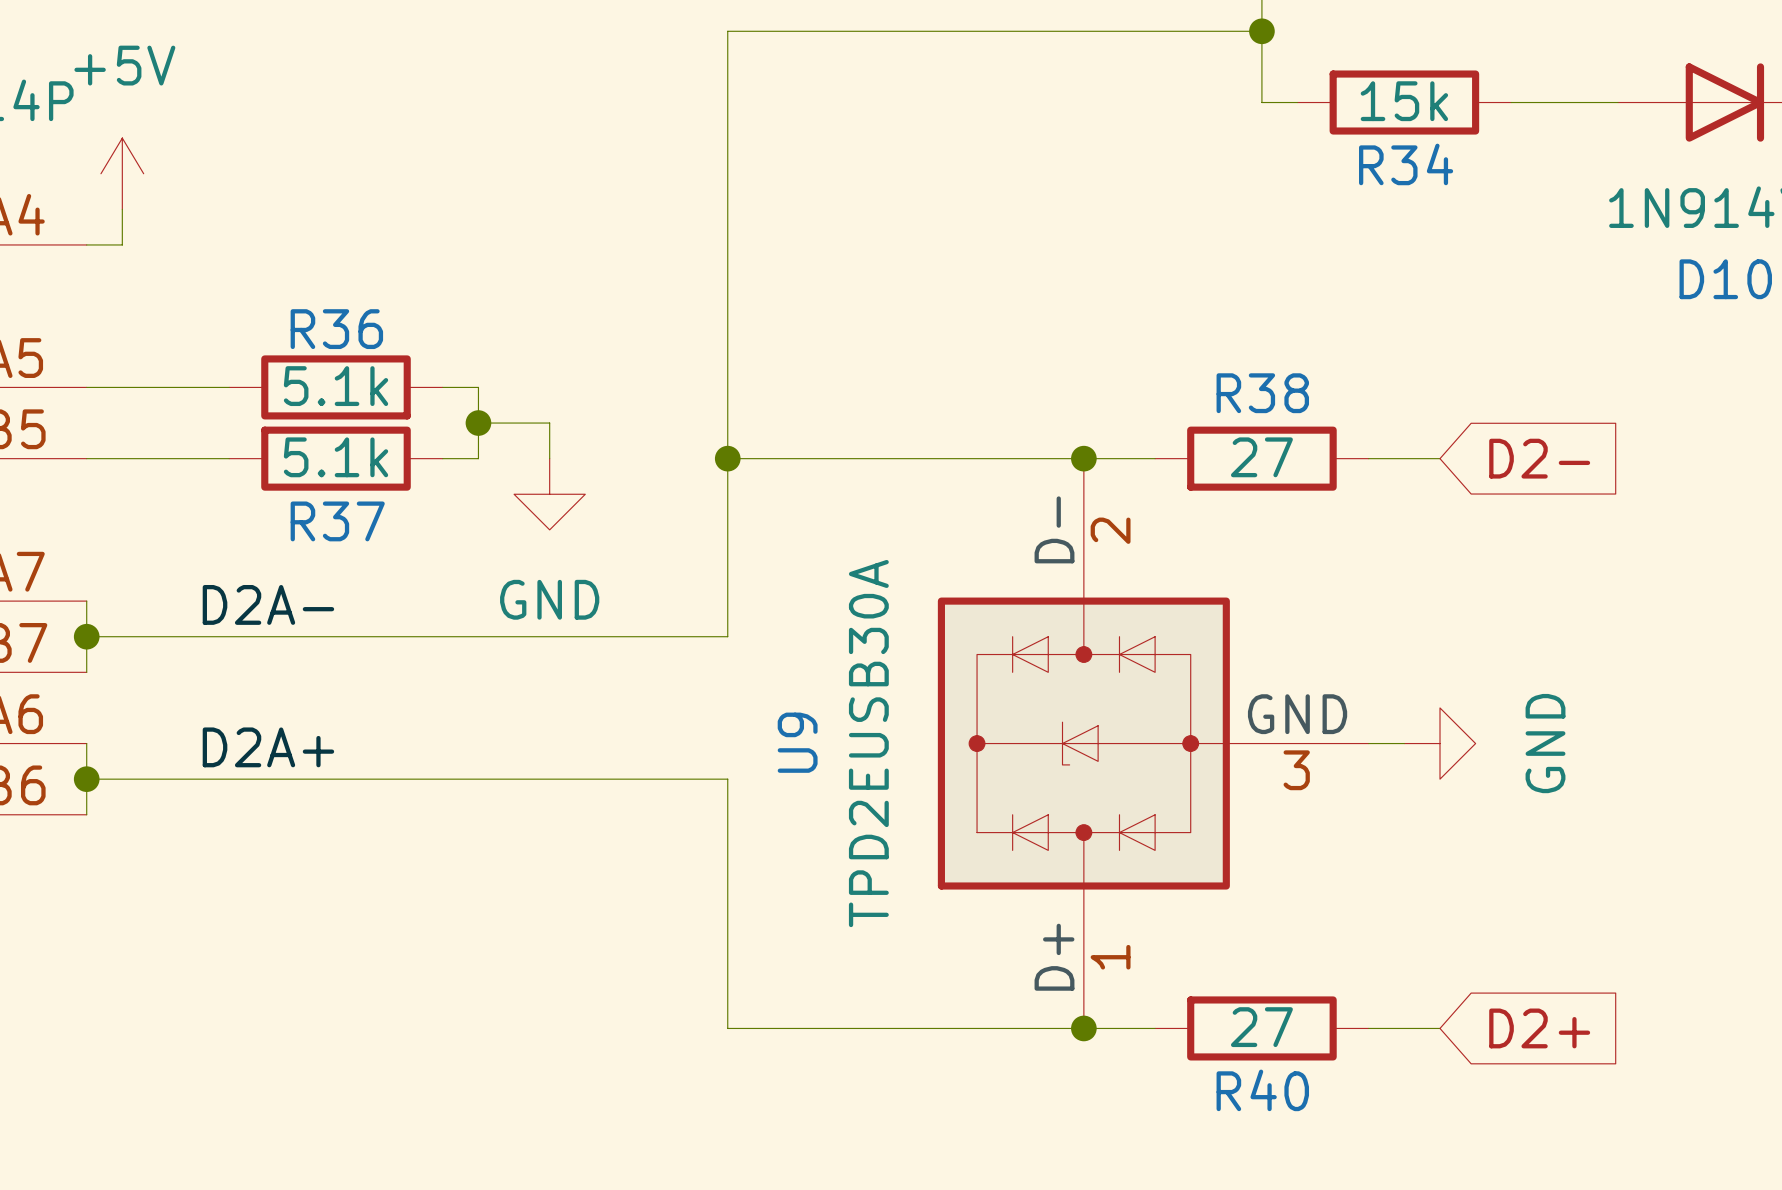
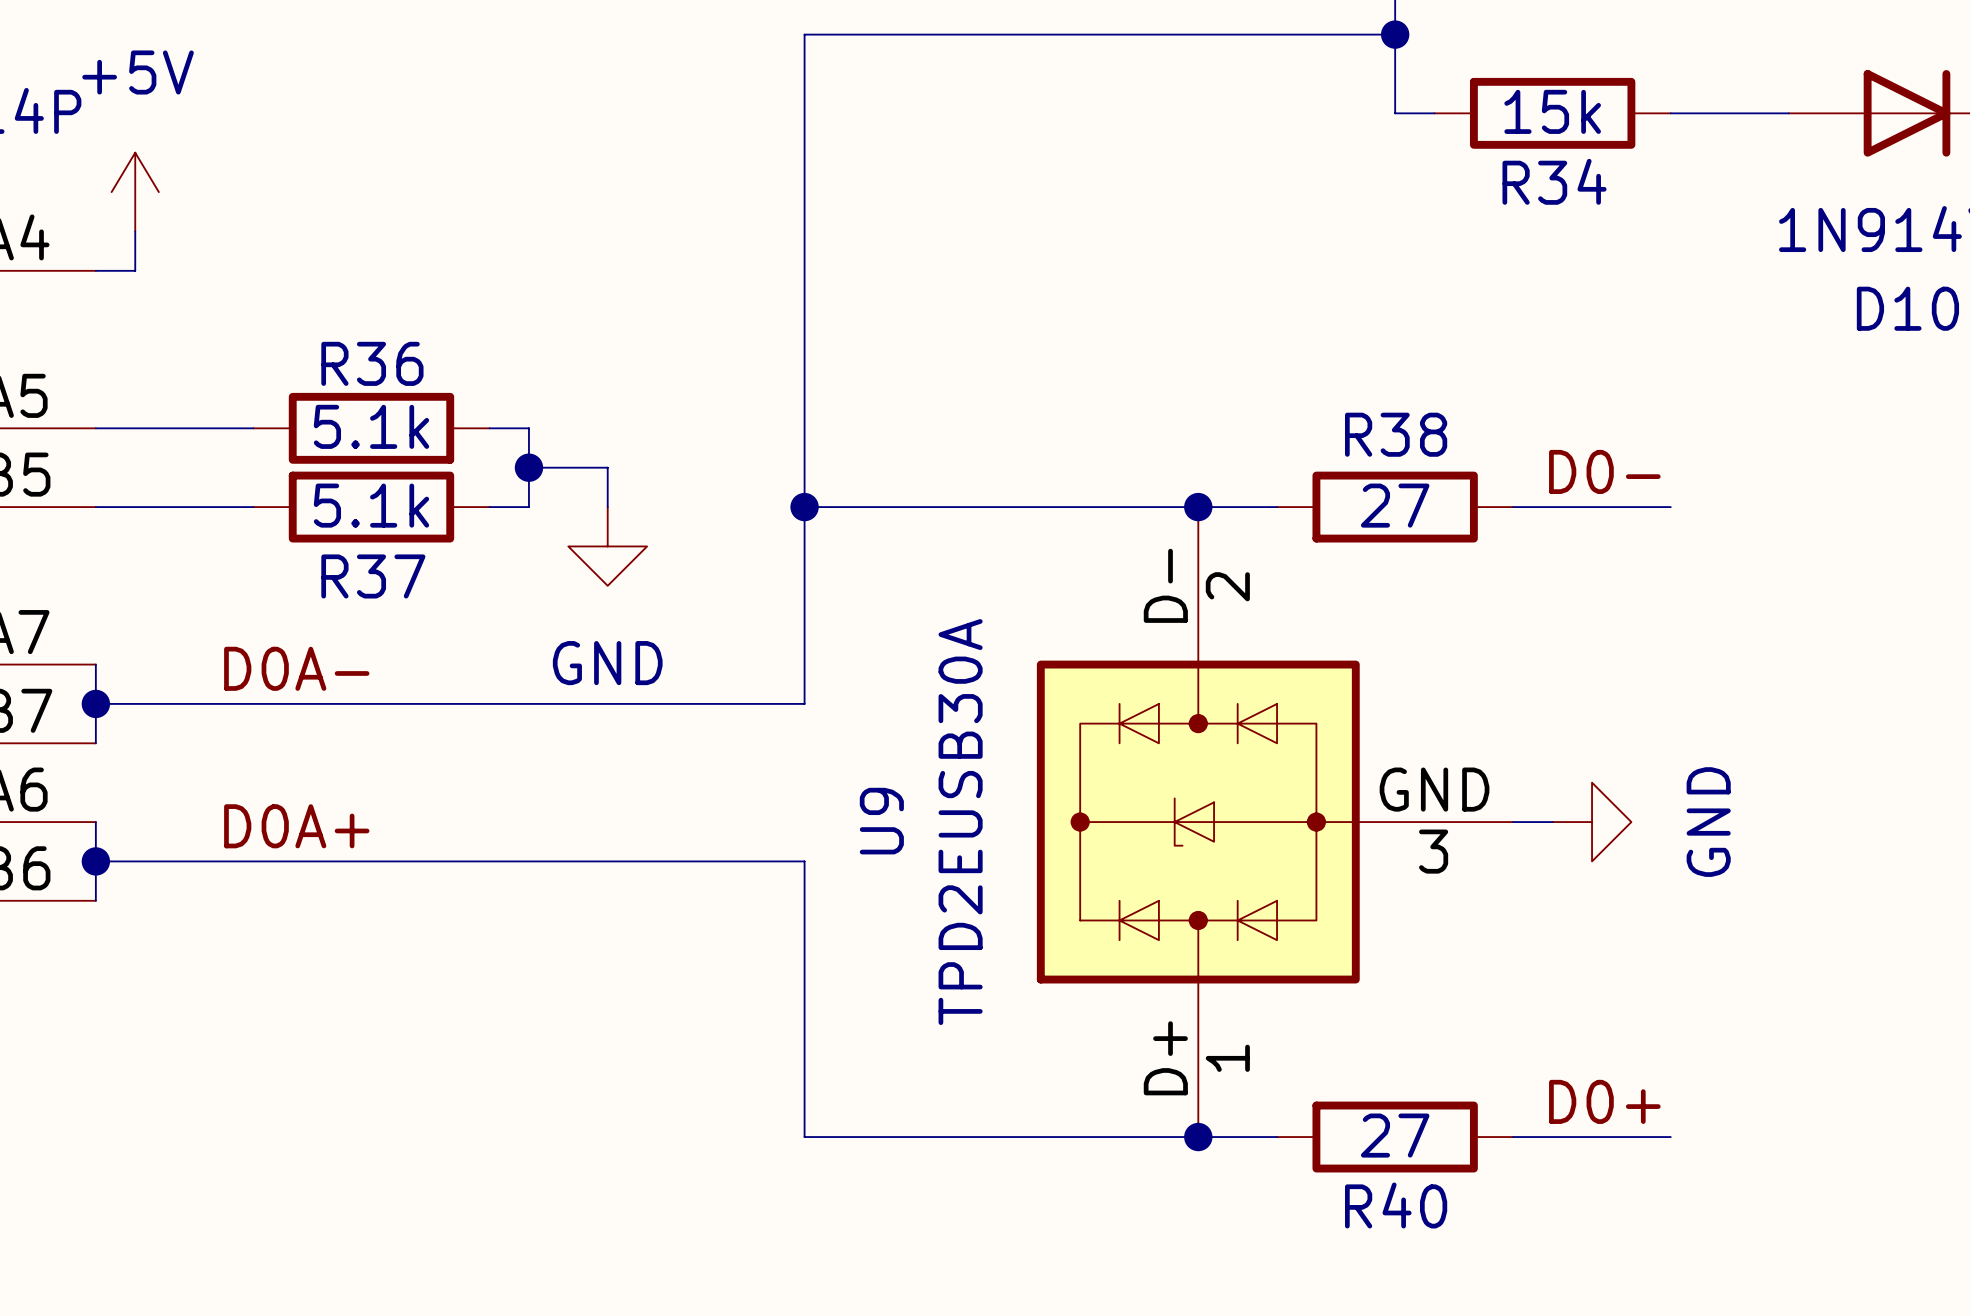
label: none -> D0- (1604, 471)
wire: none -> (1592, 507) (1670, 507)
global label: D2- (1539, 458) -> none
label: D2A- (268, 604) -> D0A- (296, 668)
label: D2A+ (268, 747) -> D0A+ (296, 826)
label: none -> D0+ (1604, 1101)
wire: none -> (1592, 1137) (1670, 1137)
global label: D2+ (1539, 1028) -> none

